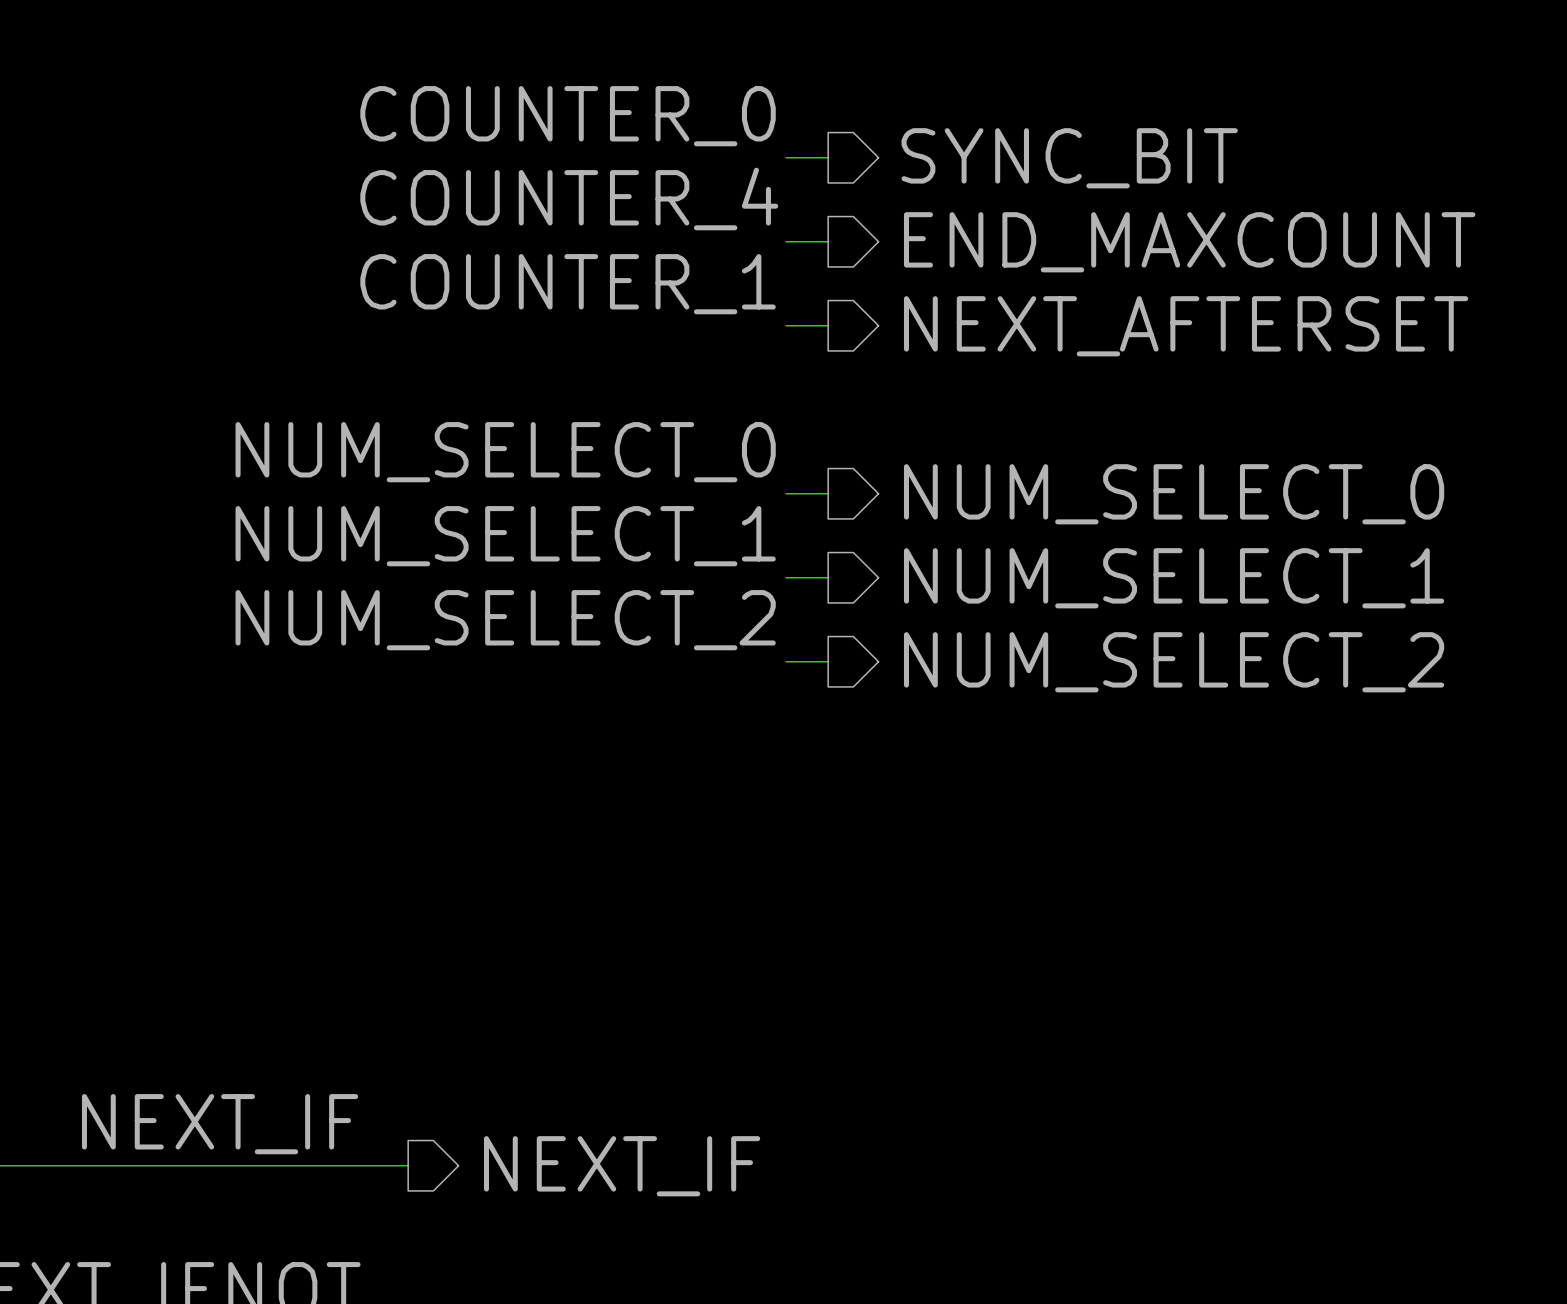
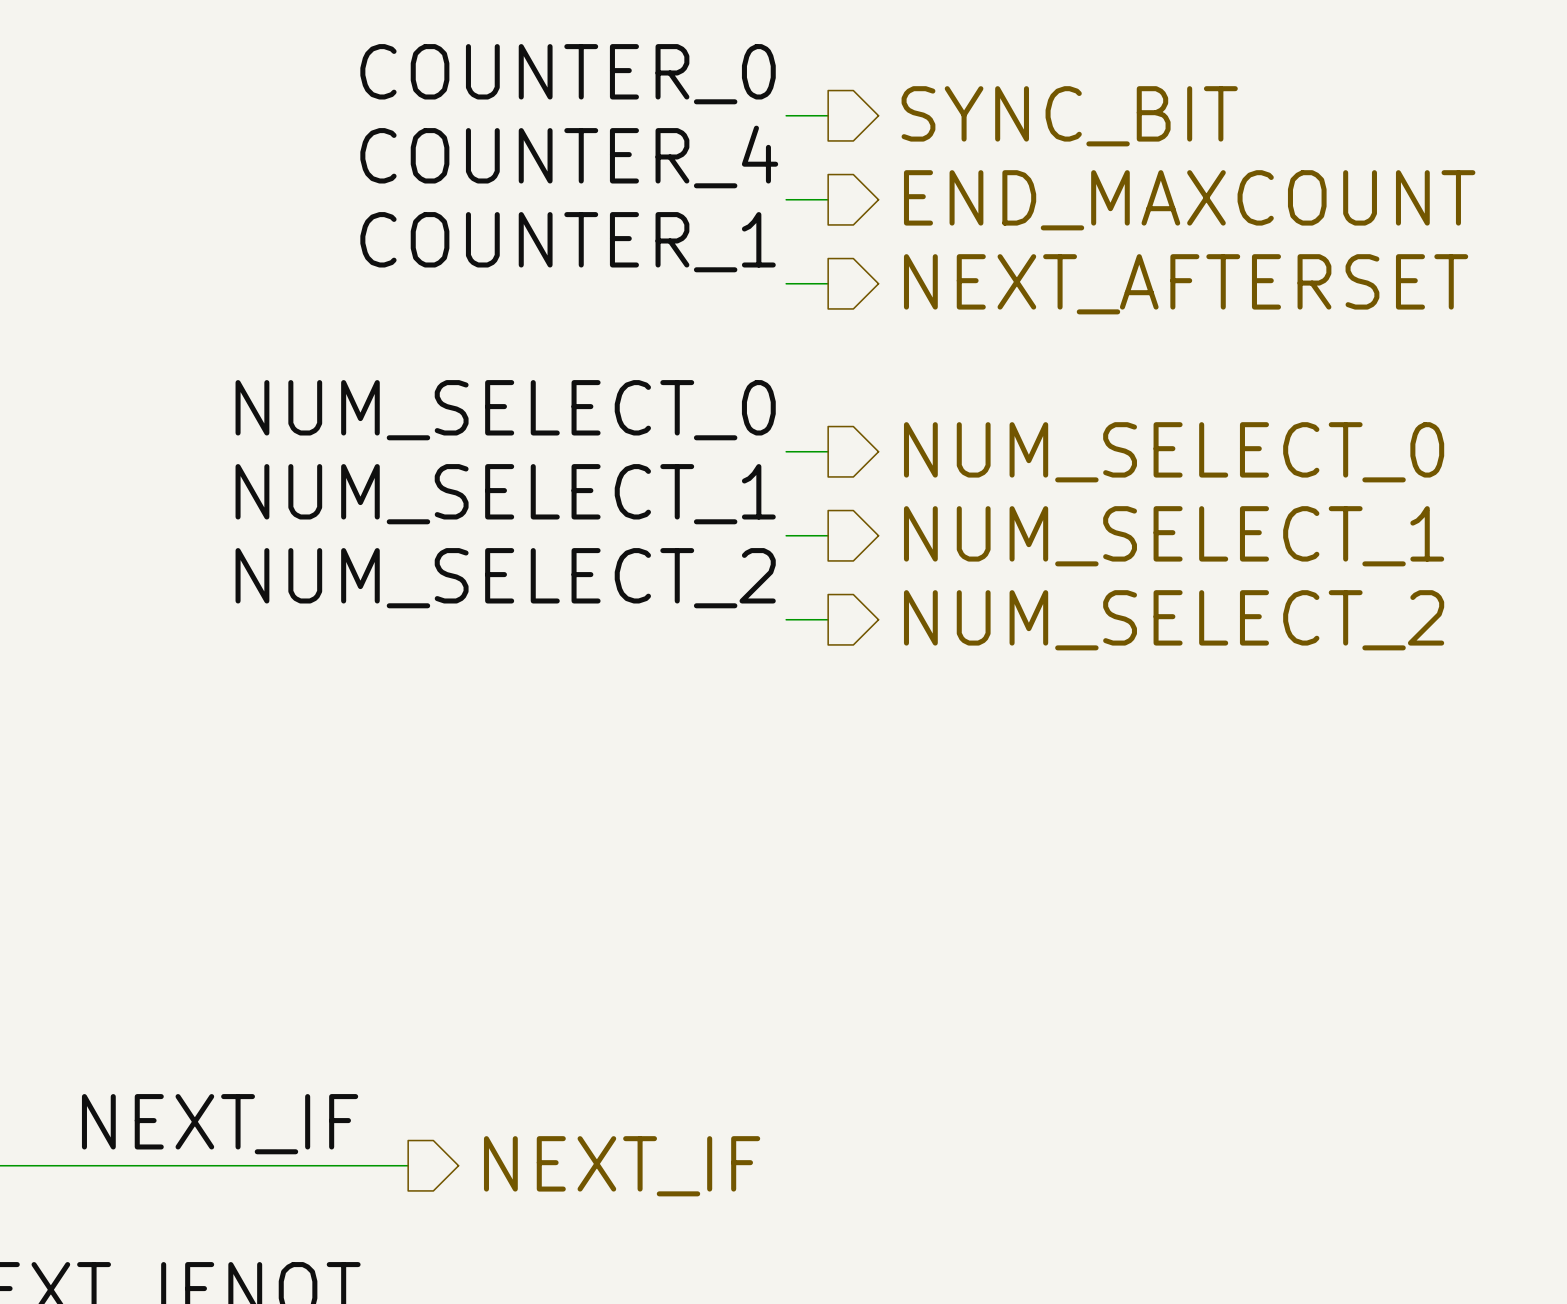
label position: COUNTER_0 (568, 116) -> COUNTER_0 (568, 74)
wire: (786, 157) (828, 157) -> (786, 115) (828, 115)
hierarchical label position: SYNC_BIT (1069, 158) -> SYNC_BIT (1069, 116)
label position: COUNTER_4 (569, 198) -> COUNTER_4 (569, 156)
wire: (786, 241) (828, 241) -> (786, 199) (828, 199)
hierarchical label position: END_MAXCOUNT (1189, 242) -> END_MAXCOUNT (1189, 200)
label position: COUNTER_1 (568, 284) -> COUNTER_1 (568, 242)
wire: (786, 325) (828, 325) -> (786, 283) (828, 283)
hierarchical label position: NEXT_AFTERSET (1186, 326) -> NEXT_AFTERSET (1186, 284)
label position: NUM_SELECT_0 (505, 452) -> NUM_SELECT_0 (505, 410)
wire: (786, 493) (828, 493) -> (786, 451) (828, 451)
hierarchical label position: NUM_SELECT_0 (1174, 494) -> NUM_SELECT_0 (1174, 452)
label position: NUM_SELECT_1 (505, 536) -> NUM_SELECT_1 (505, 494)
wire: (786, 577) (828, 577) -> (786, 535) (828, 535)
hierarchical label position: NUM_SELECT_1 (1174, 578) -> NUM_SELECT_1 (1174, 536)
label position: NUM_SELECT_2 (505, 620) -> NUM_SELECT_2 (505, 578)
wire: (786, 661) (828, 661) -> (786, 619) (828, 619)
hierarchical label position: NUM_SELECT_2 (1174, 662) -> NUM_SELECT_2 (1174, 620)

